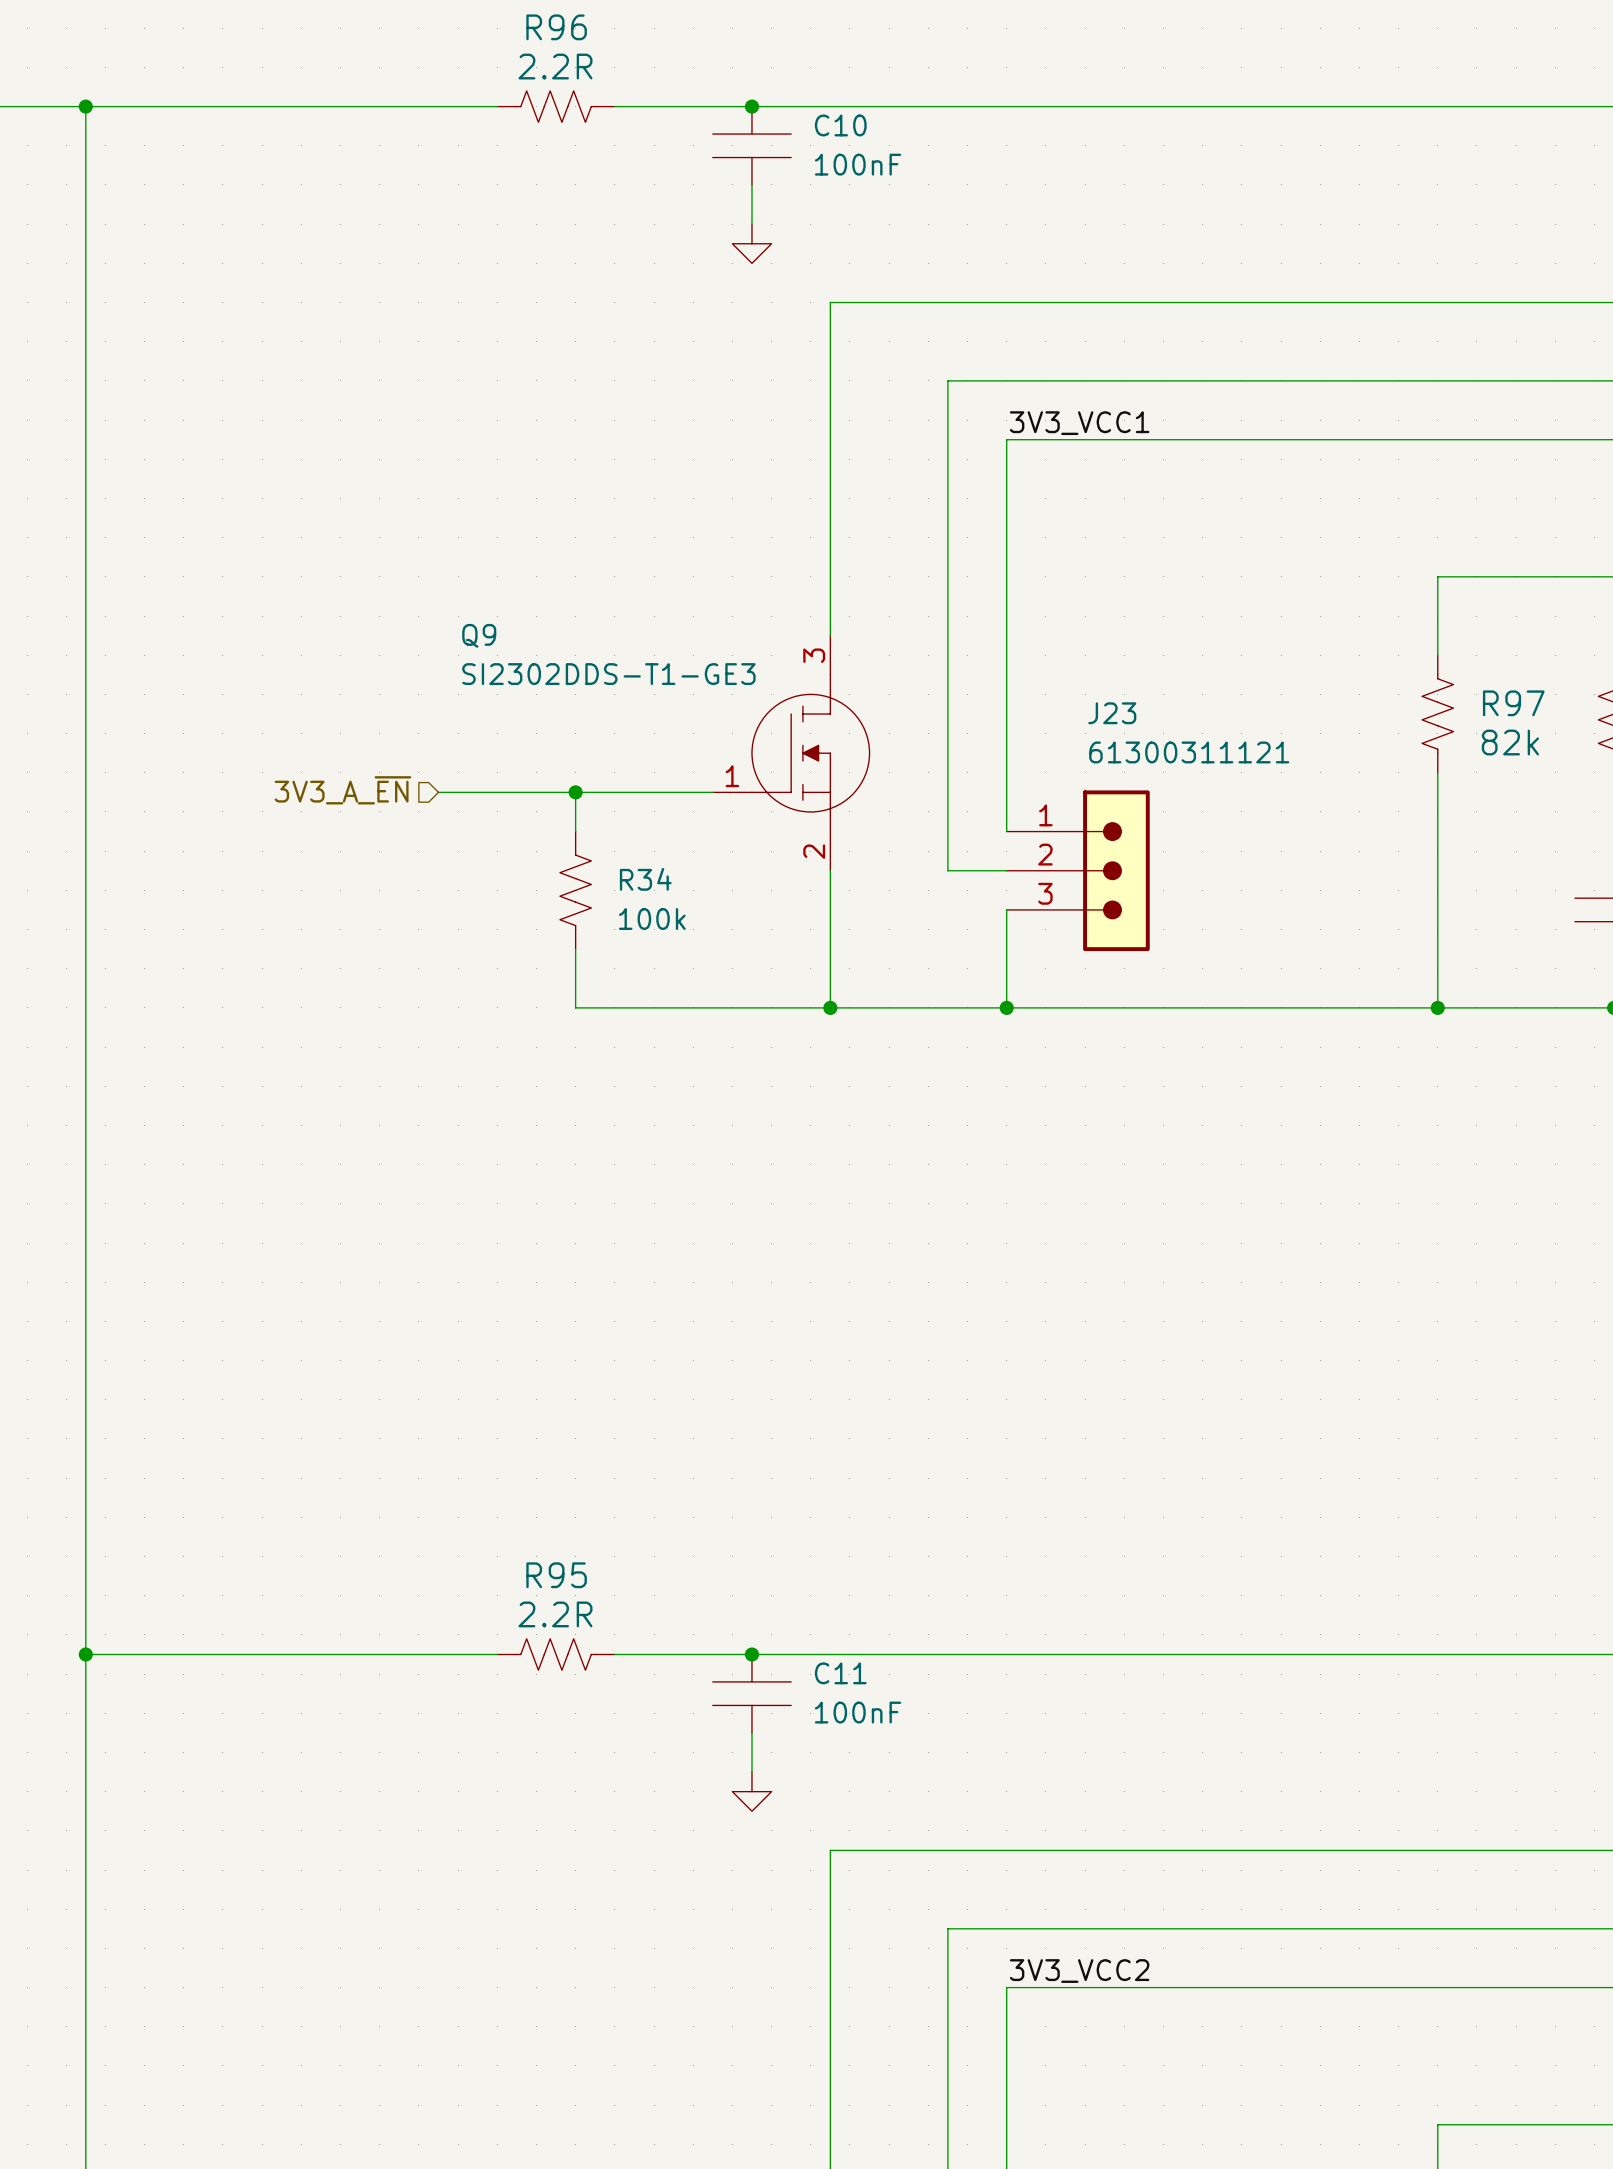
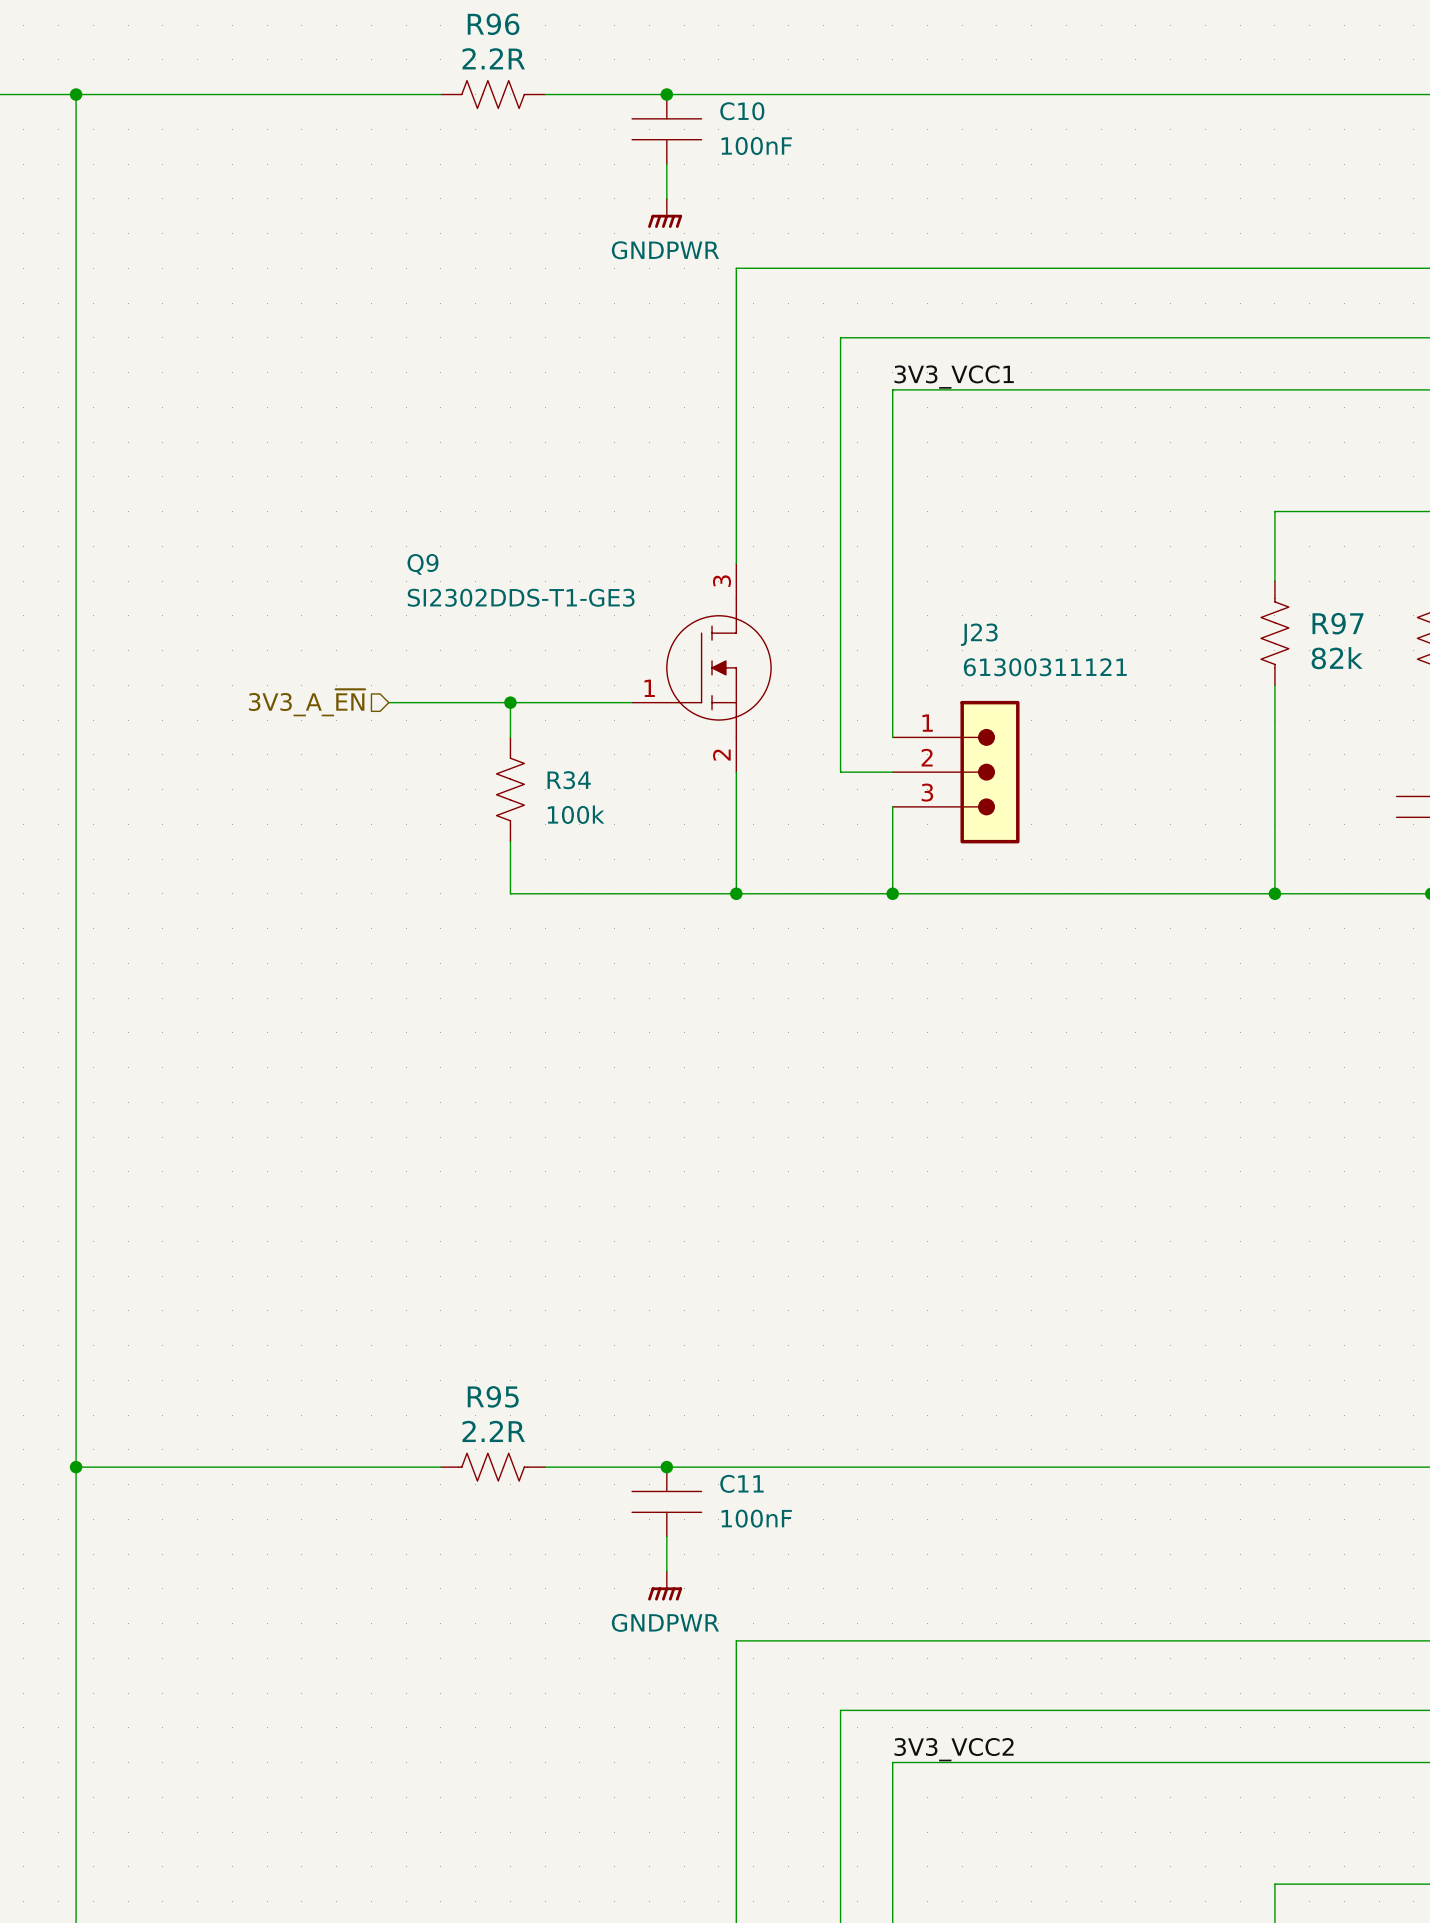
power symbol shape: [732, 224, 772, 264] -> [648, 198, 683, 228]
power symbol text: none -> GNDPWR (665, 250)
power symbol shape: [732, 1772, 772, 1812] -> [648, 1571, 683, 1601]
power symbol text: none -> GNDPWR (665, 1622)

